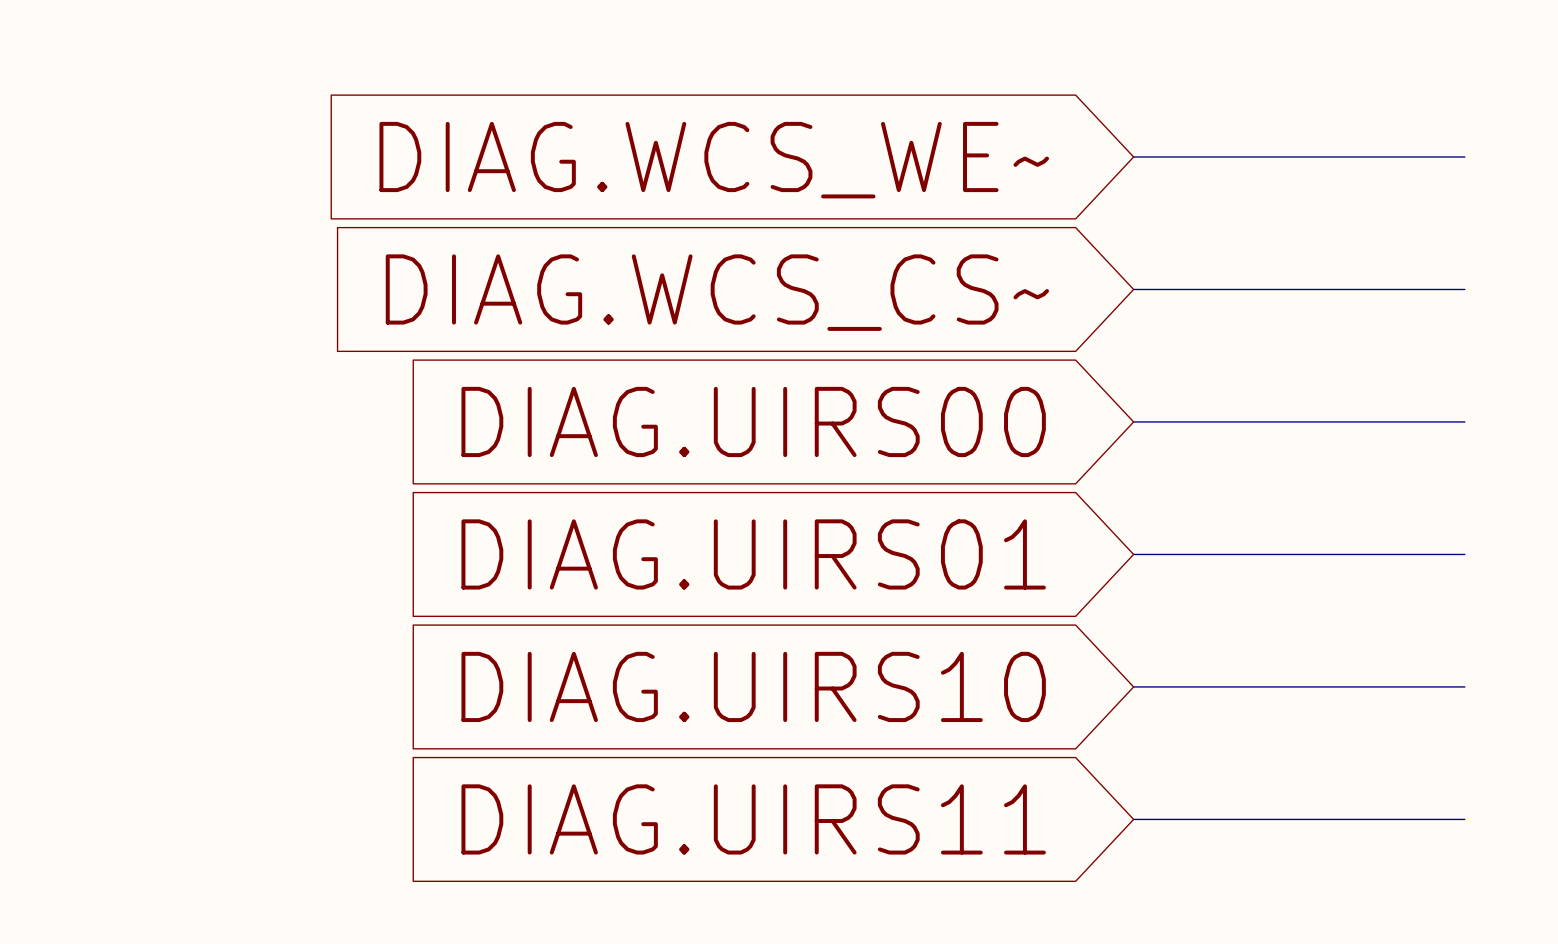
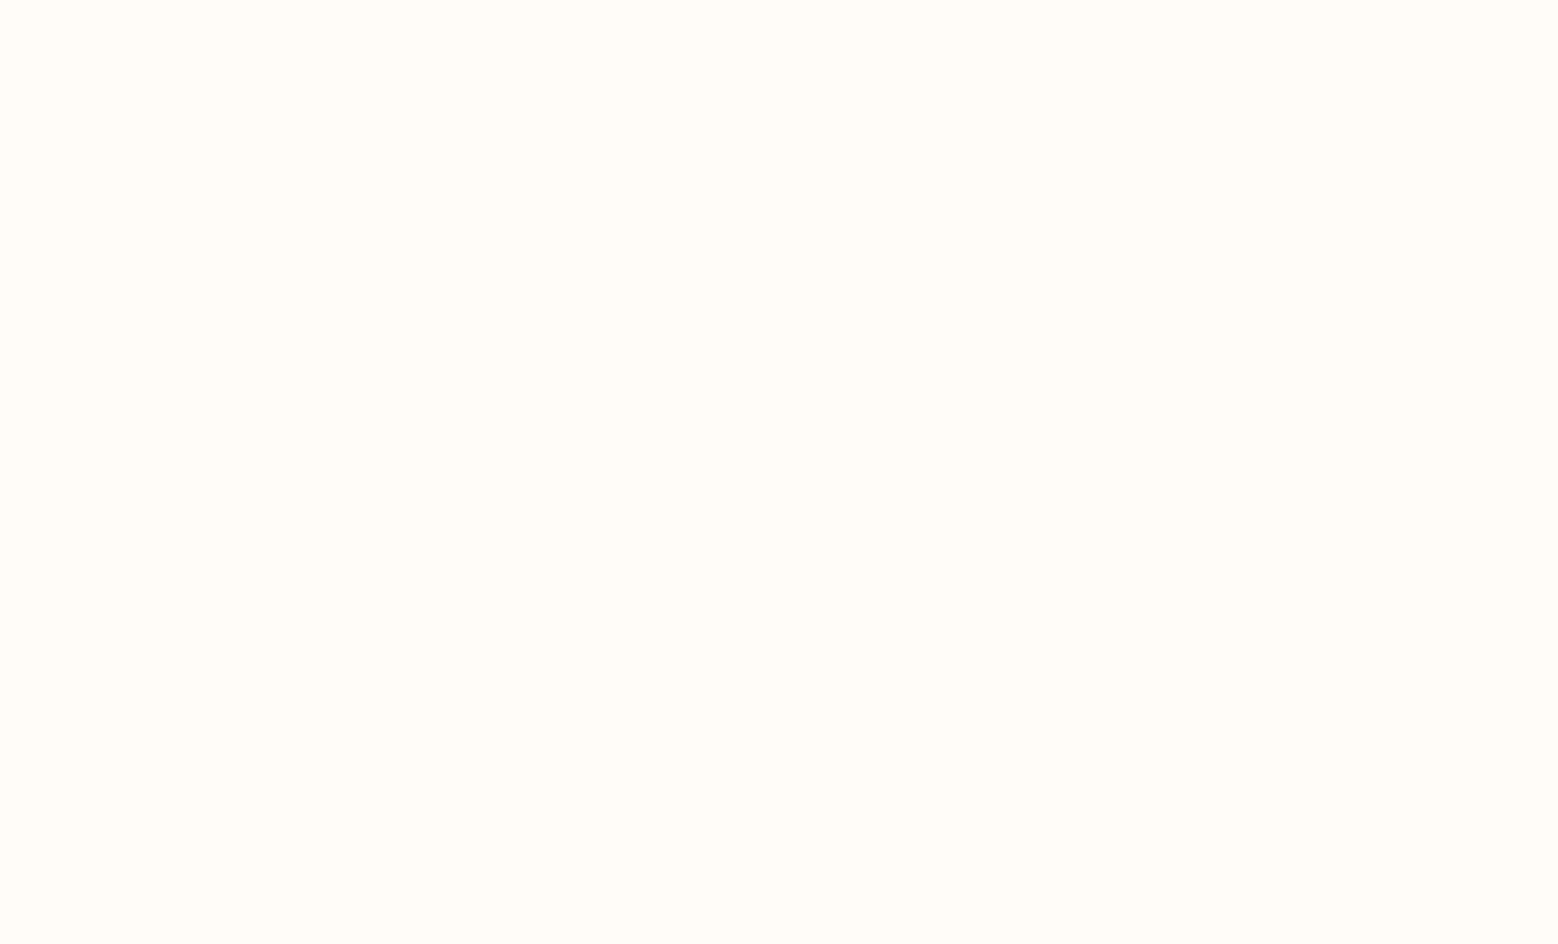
wire: (1133, 156) (1464, 156) -> none
global label: DIAG.WCS_WE~ (714, 160) -> none
wire: (1133, 289) (1464, 289) -> none
global label: DIAG.WCS_CS~ (717, 292) -> none
global label: DIAG.UIRS00 (753, 421) -> none
wire: (1133, 421) (1464, 421) -> none
global label: DIAG.UIRS01 (753, 554) -> none
wire: (1133, 554) (1464, 554) -> none
global label: DIAG.UIRS10 (753, 686) -> none
wire: (1133, 686) (1464, 686) -> none
global label: DIAG.UIRS11 (753, 819) -> none
wire: (1133, 819) (1464, 819) -> none

